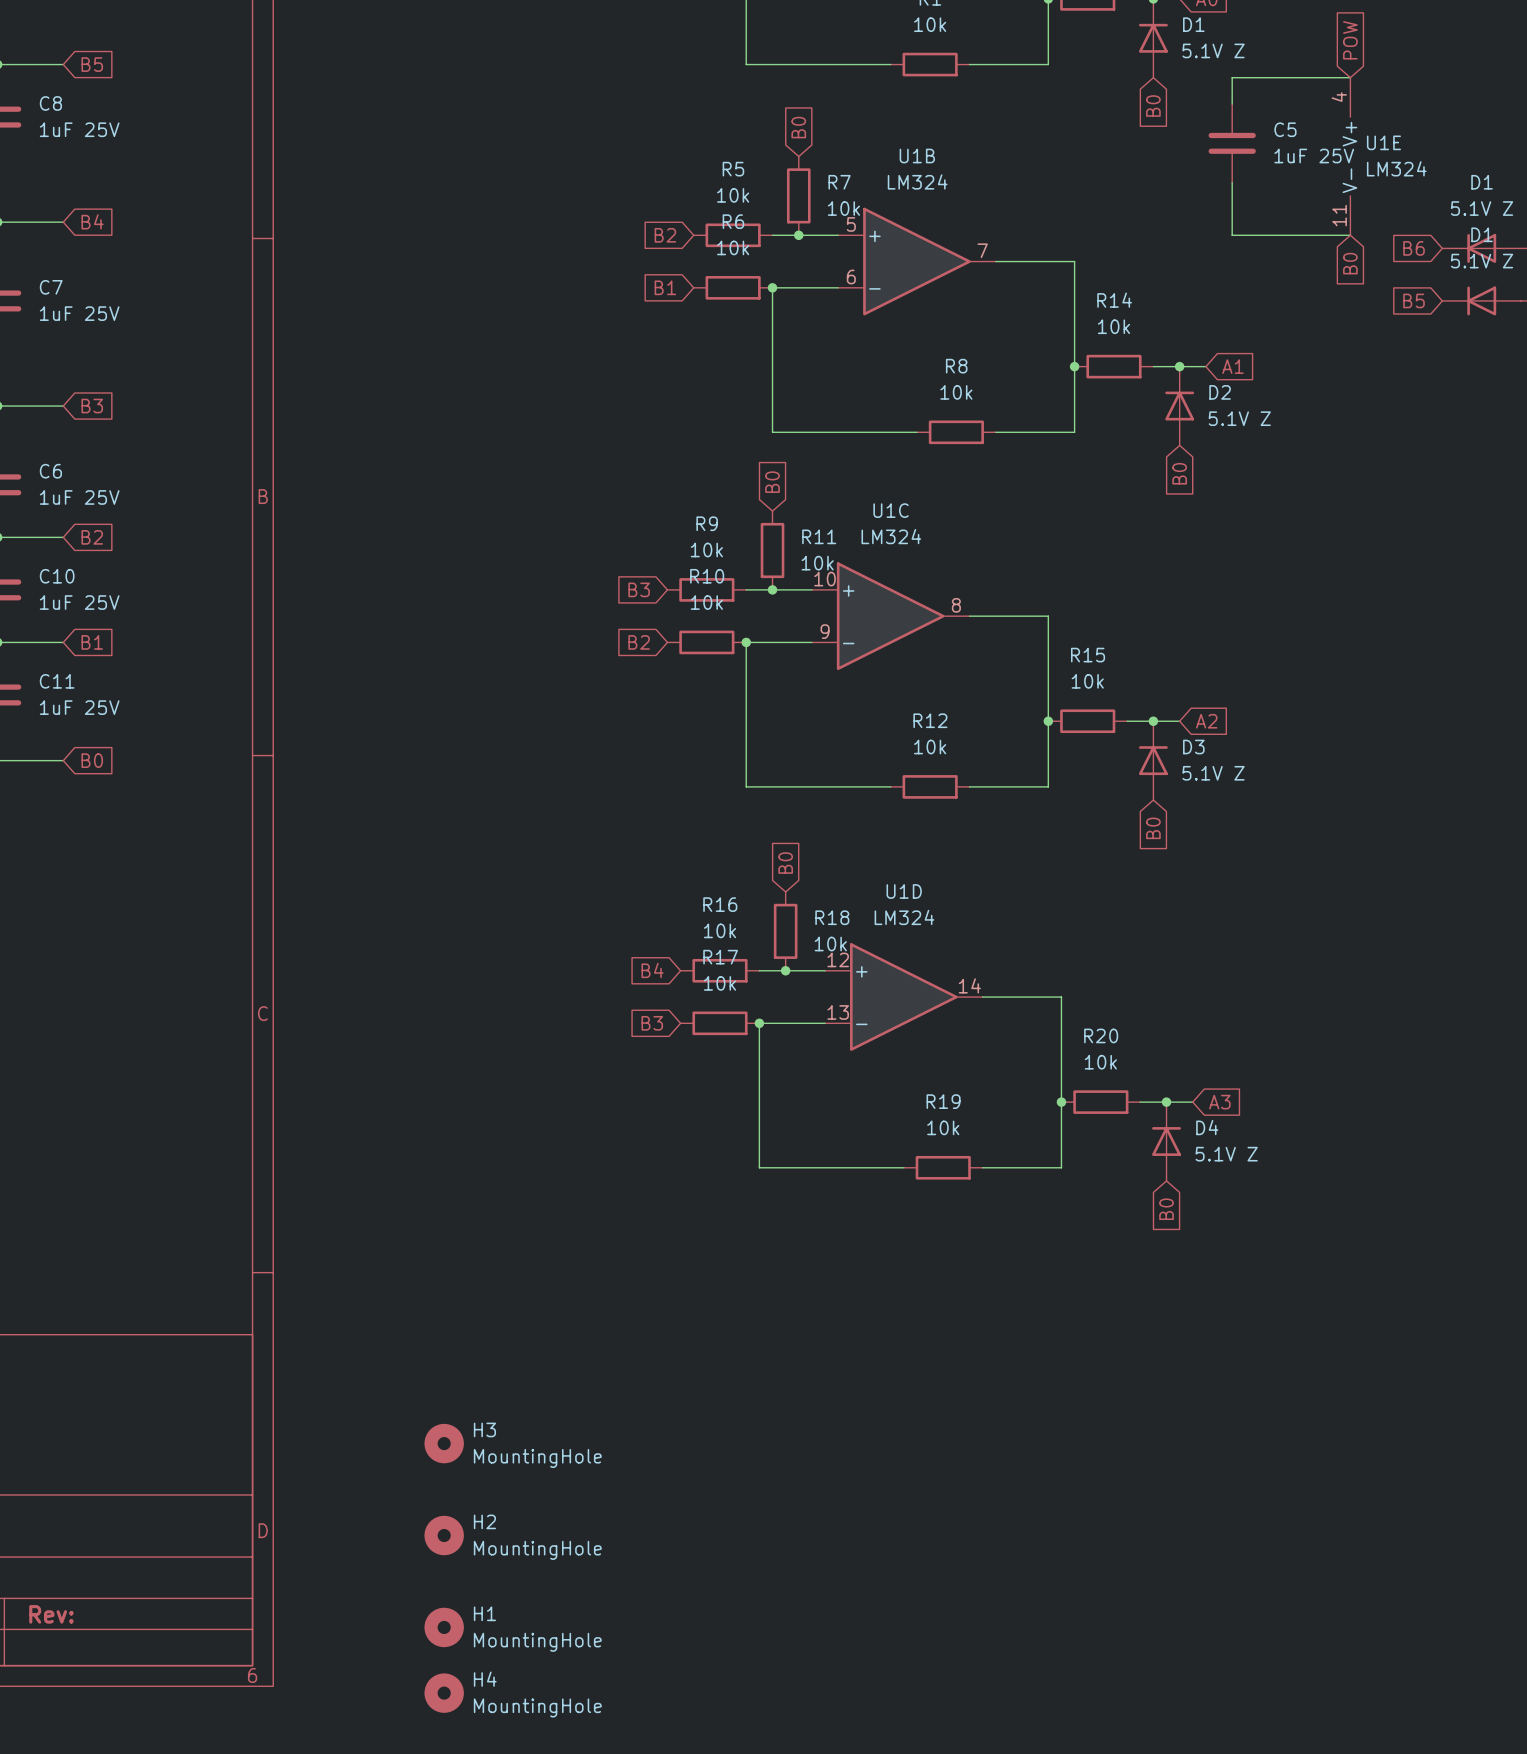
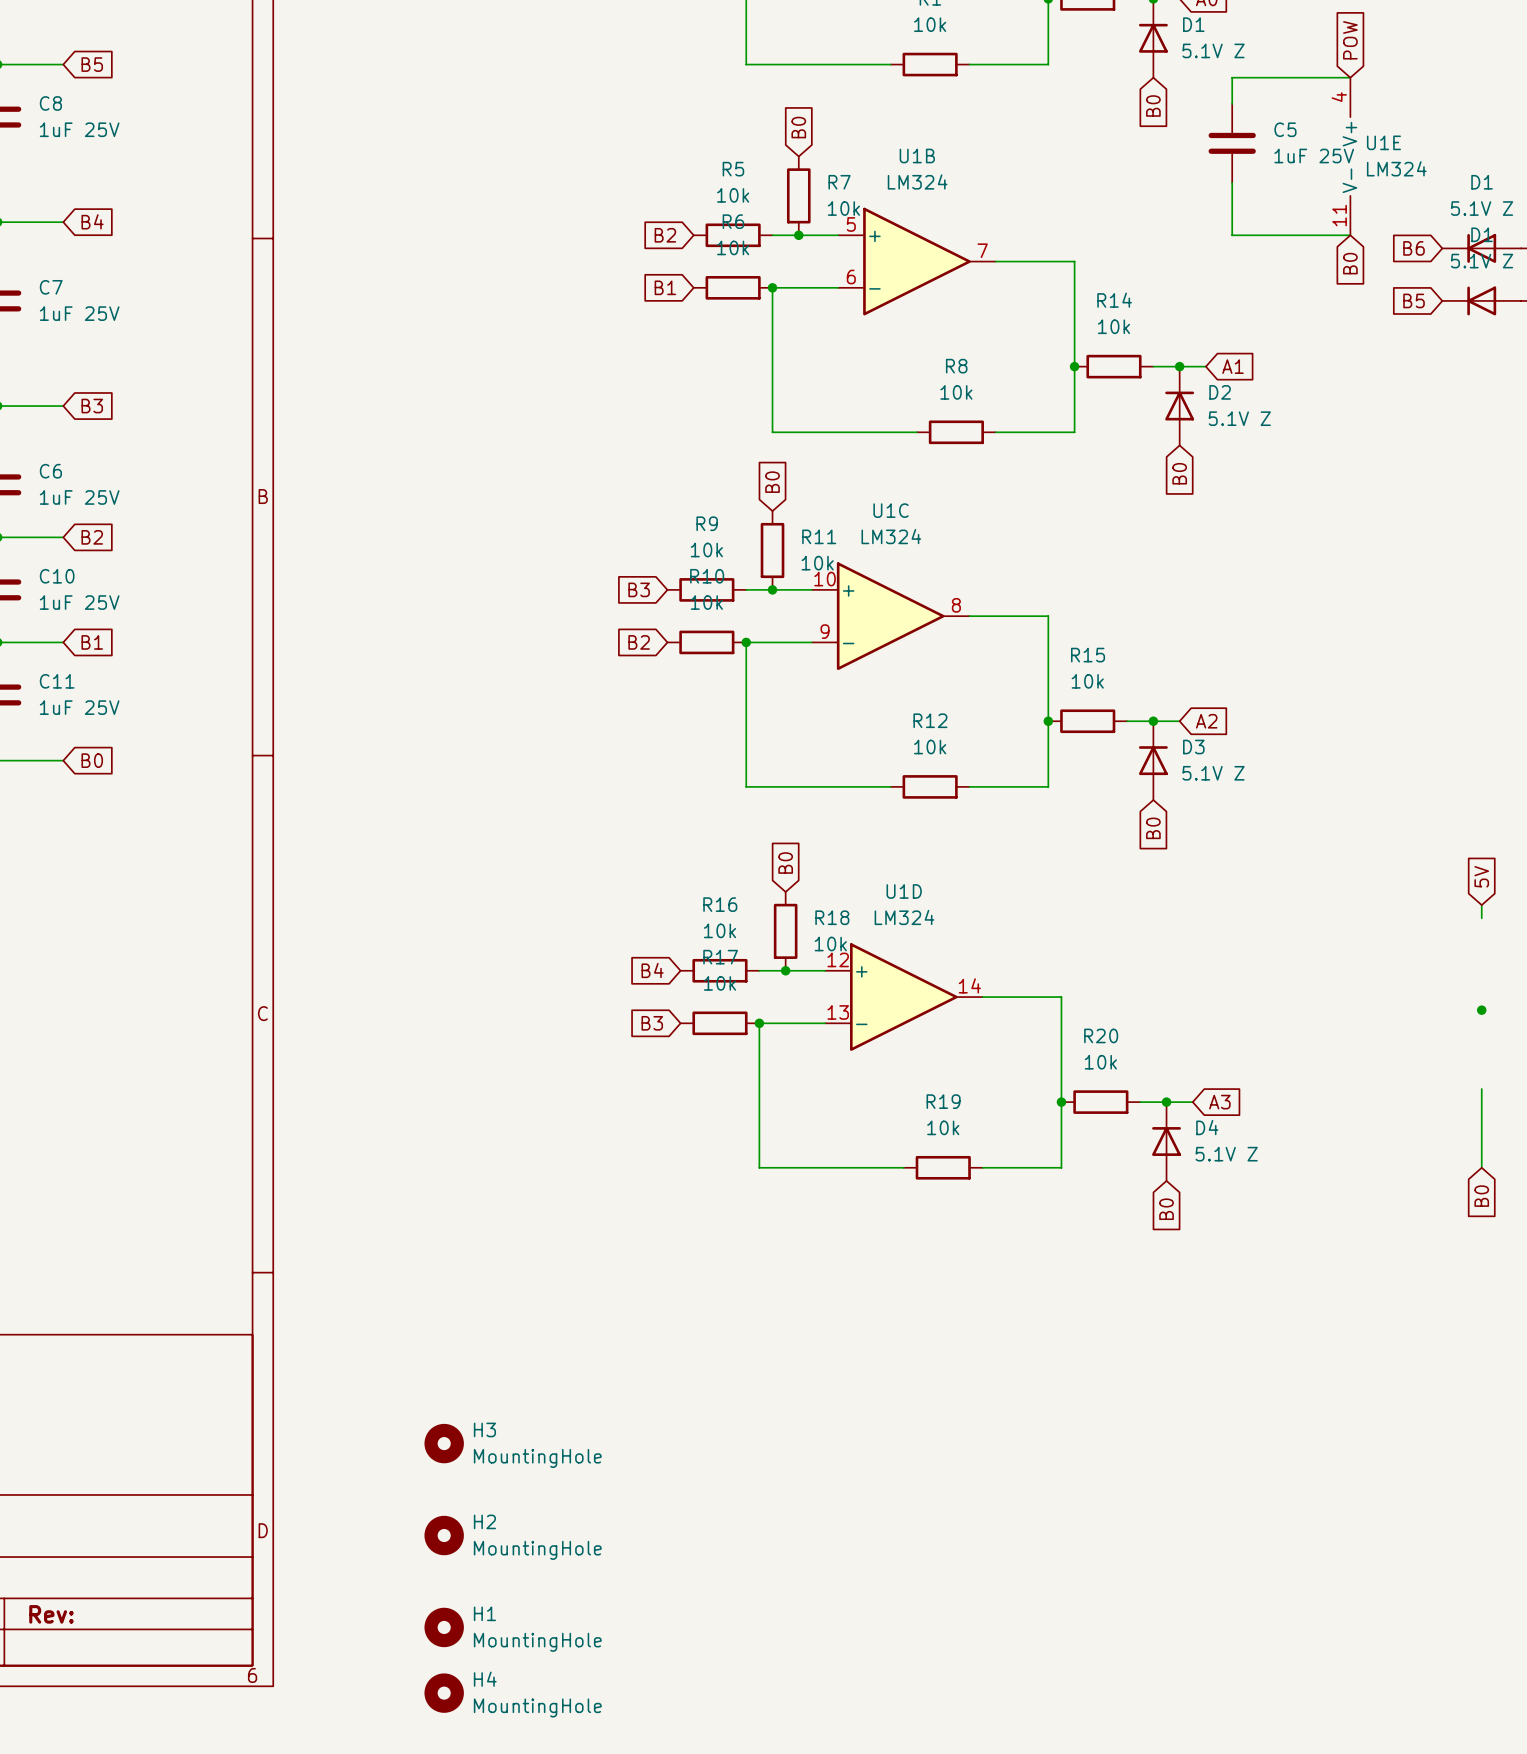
global label: none -> 5V (1481, 876)
wire: none -> (1481, 905) (1481, 918)
junction: none -> (1481, 1010)
wire: none -> (1481, 1088) (1481, 1167)
global label: none -> B0 (1481, 1196)

